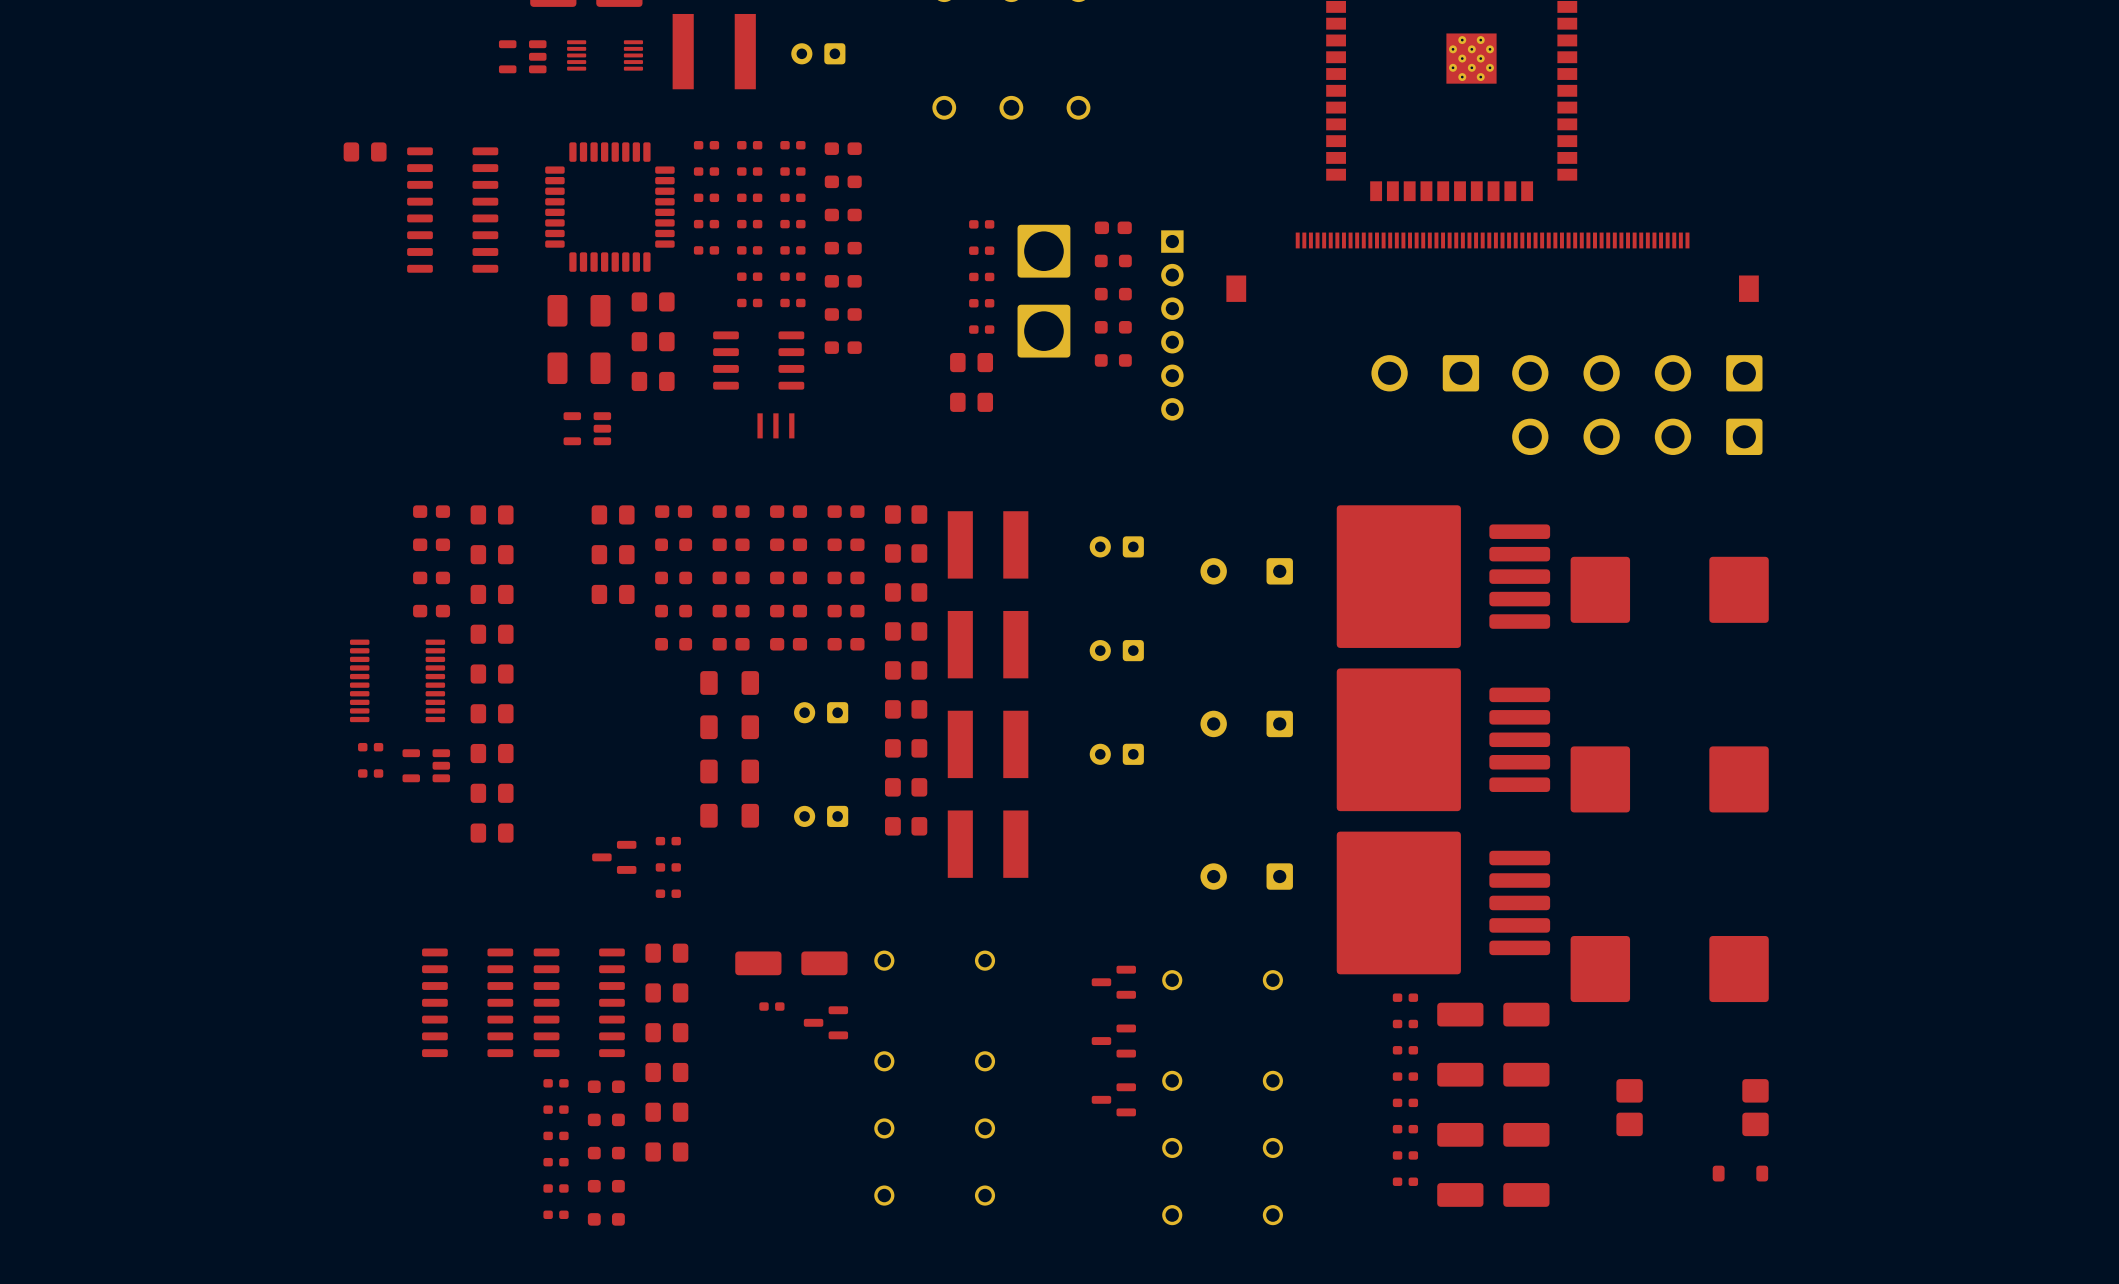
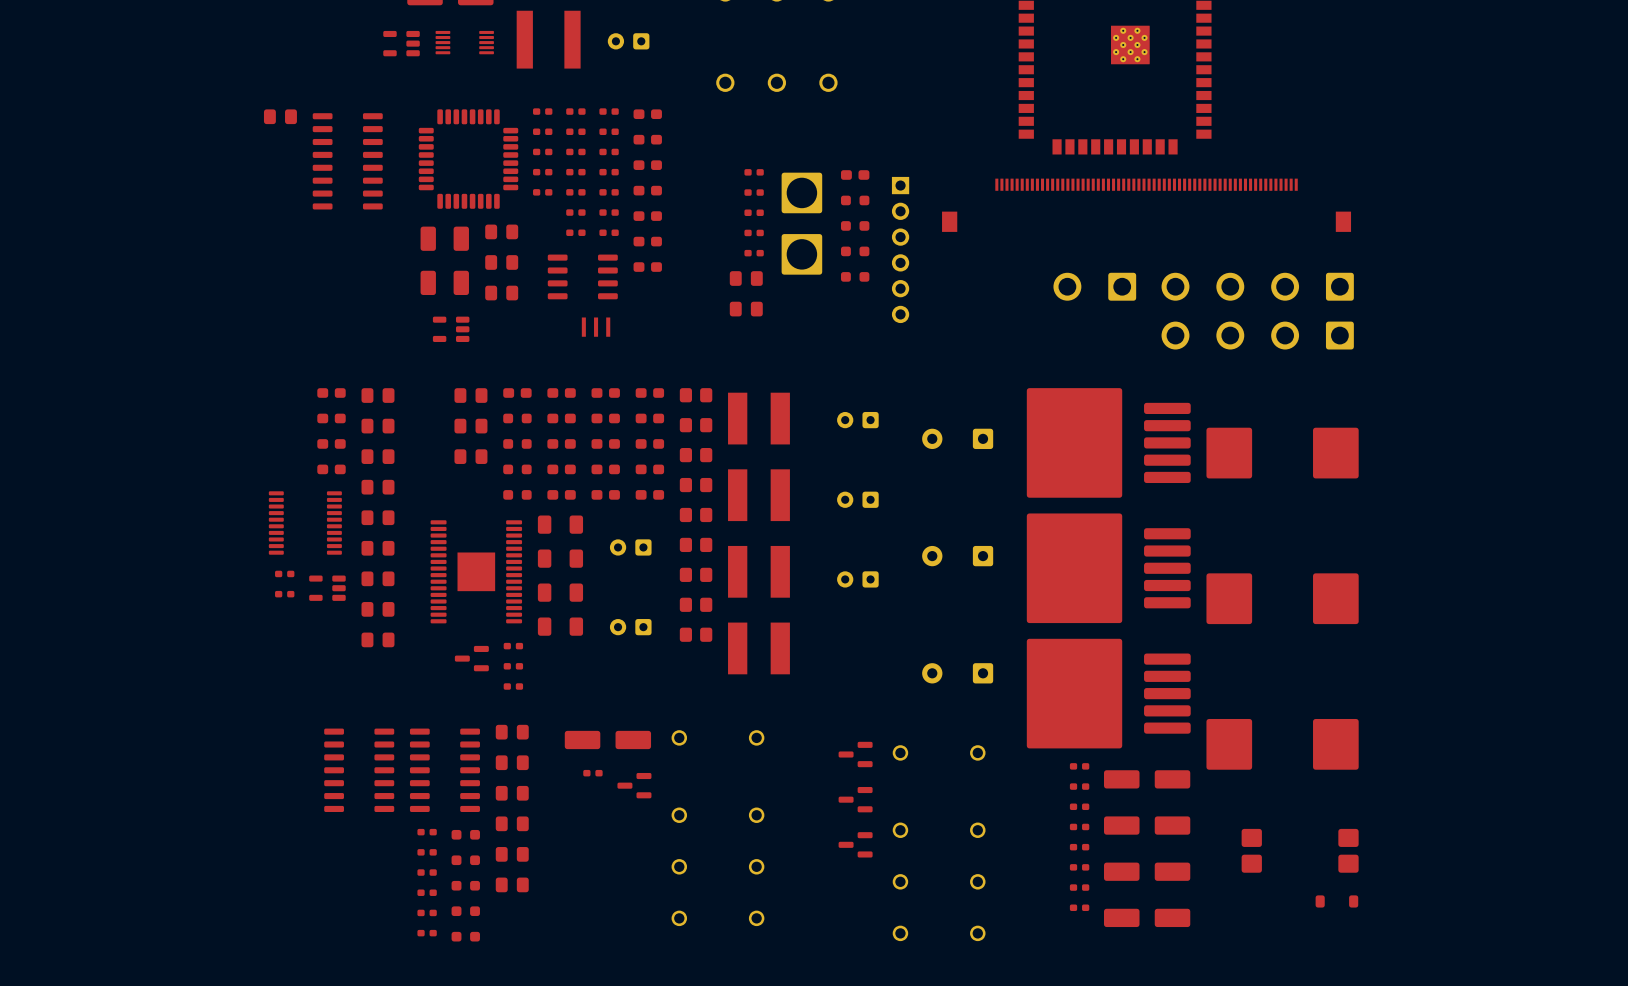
part: none -> (476, 571)

